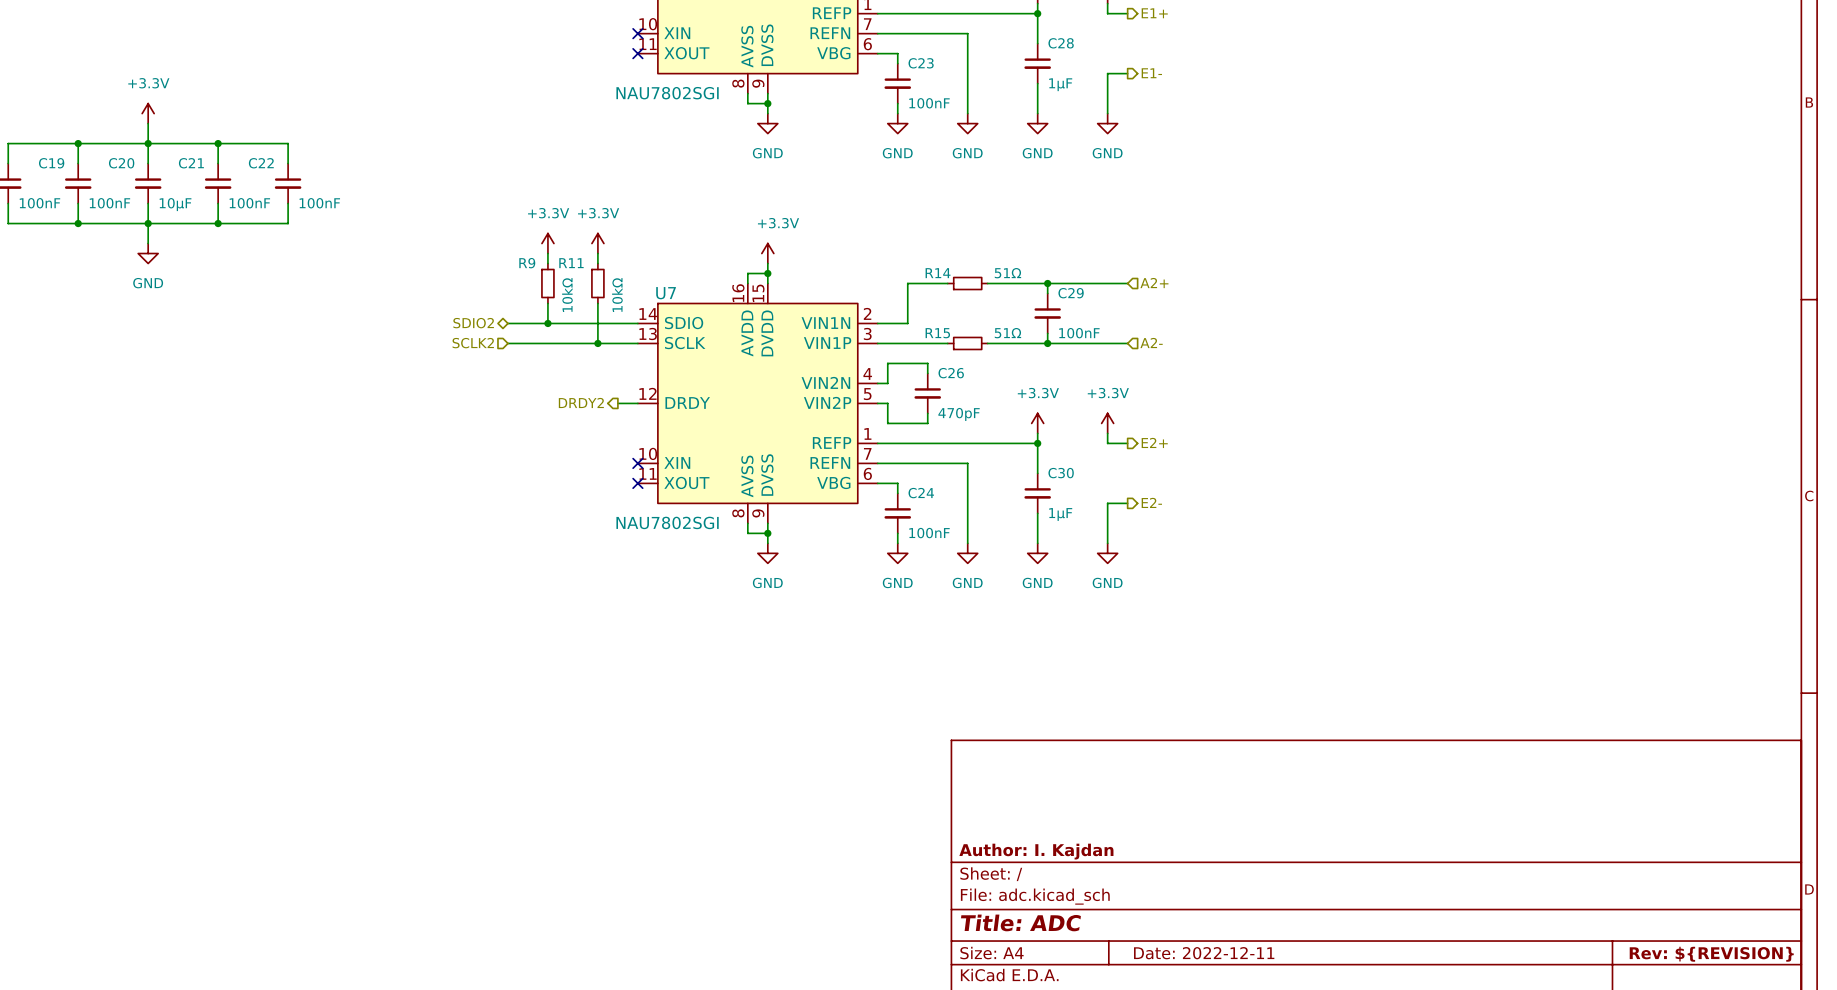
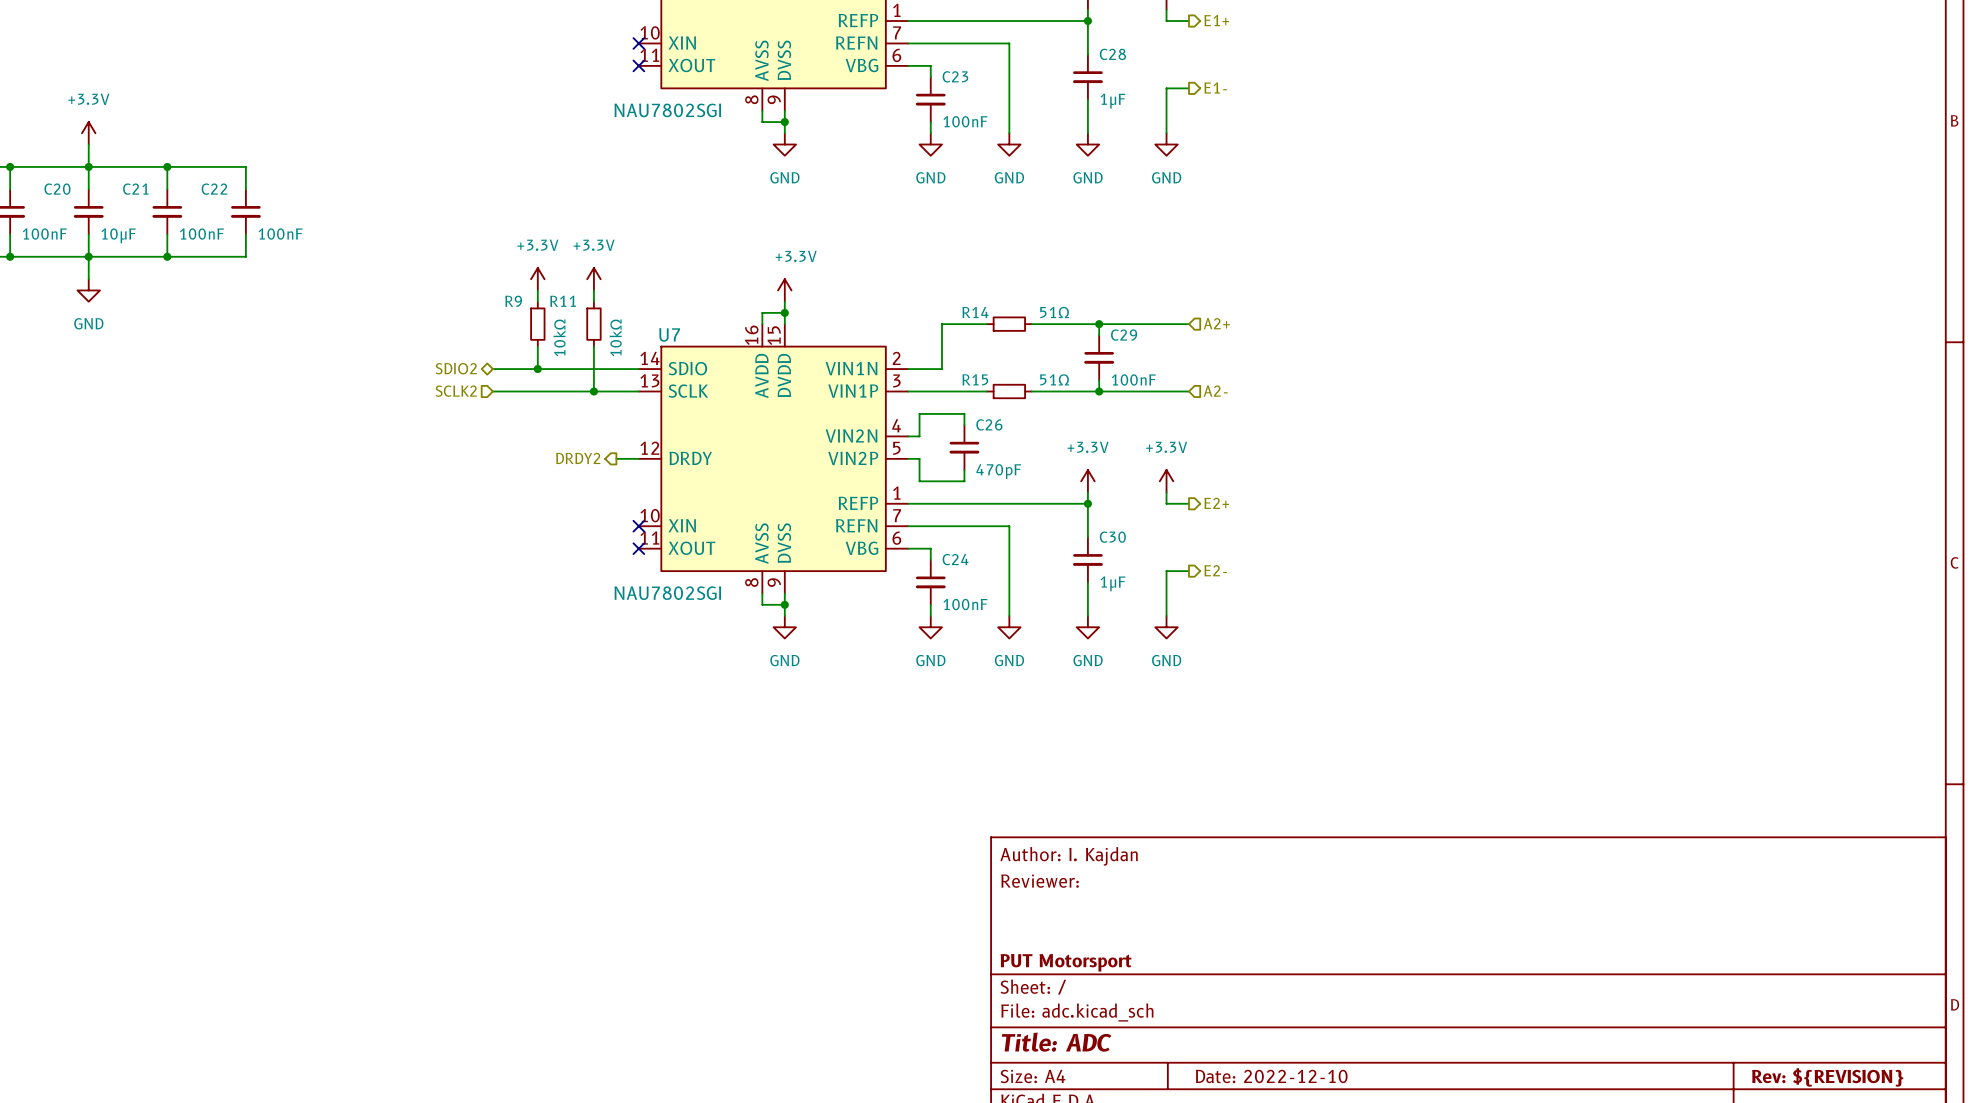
title block: none -> Author: I. Kajdan (1069, 856)
title block: none -> Reviewer: (1040, 881)
title block: Author: I. Kajdan (1036, 851) -> PUT Motorsport (1066, 962)
title block: Date: 2022-12-11 (1204, 953) -> Date: 2022-12-10 (1271, 1076)

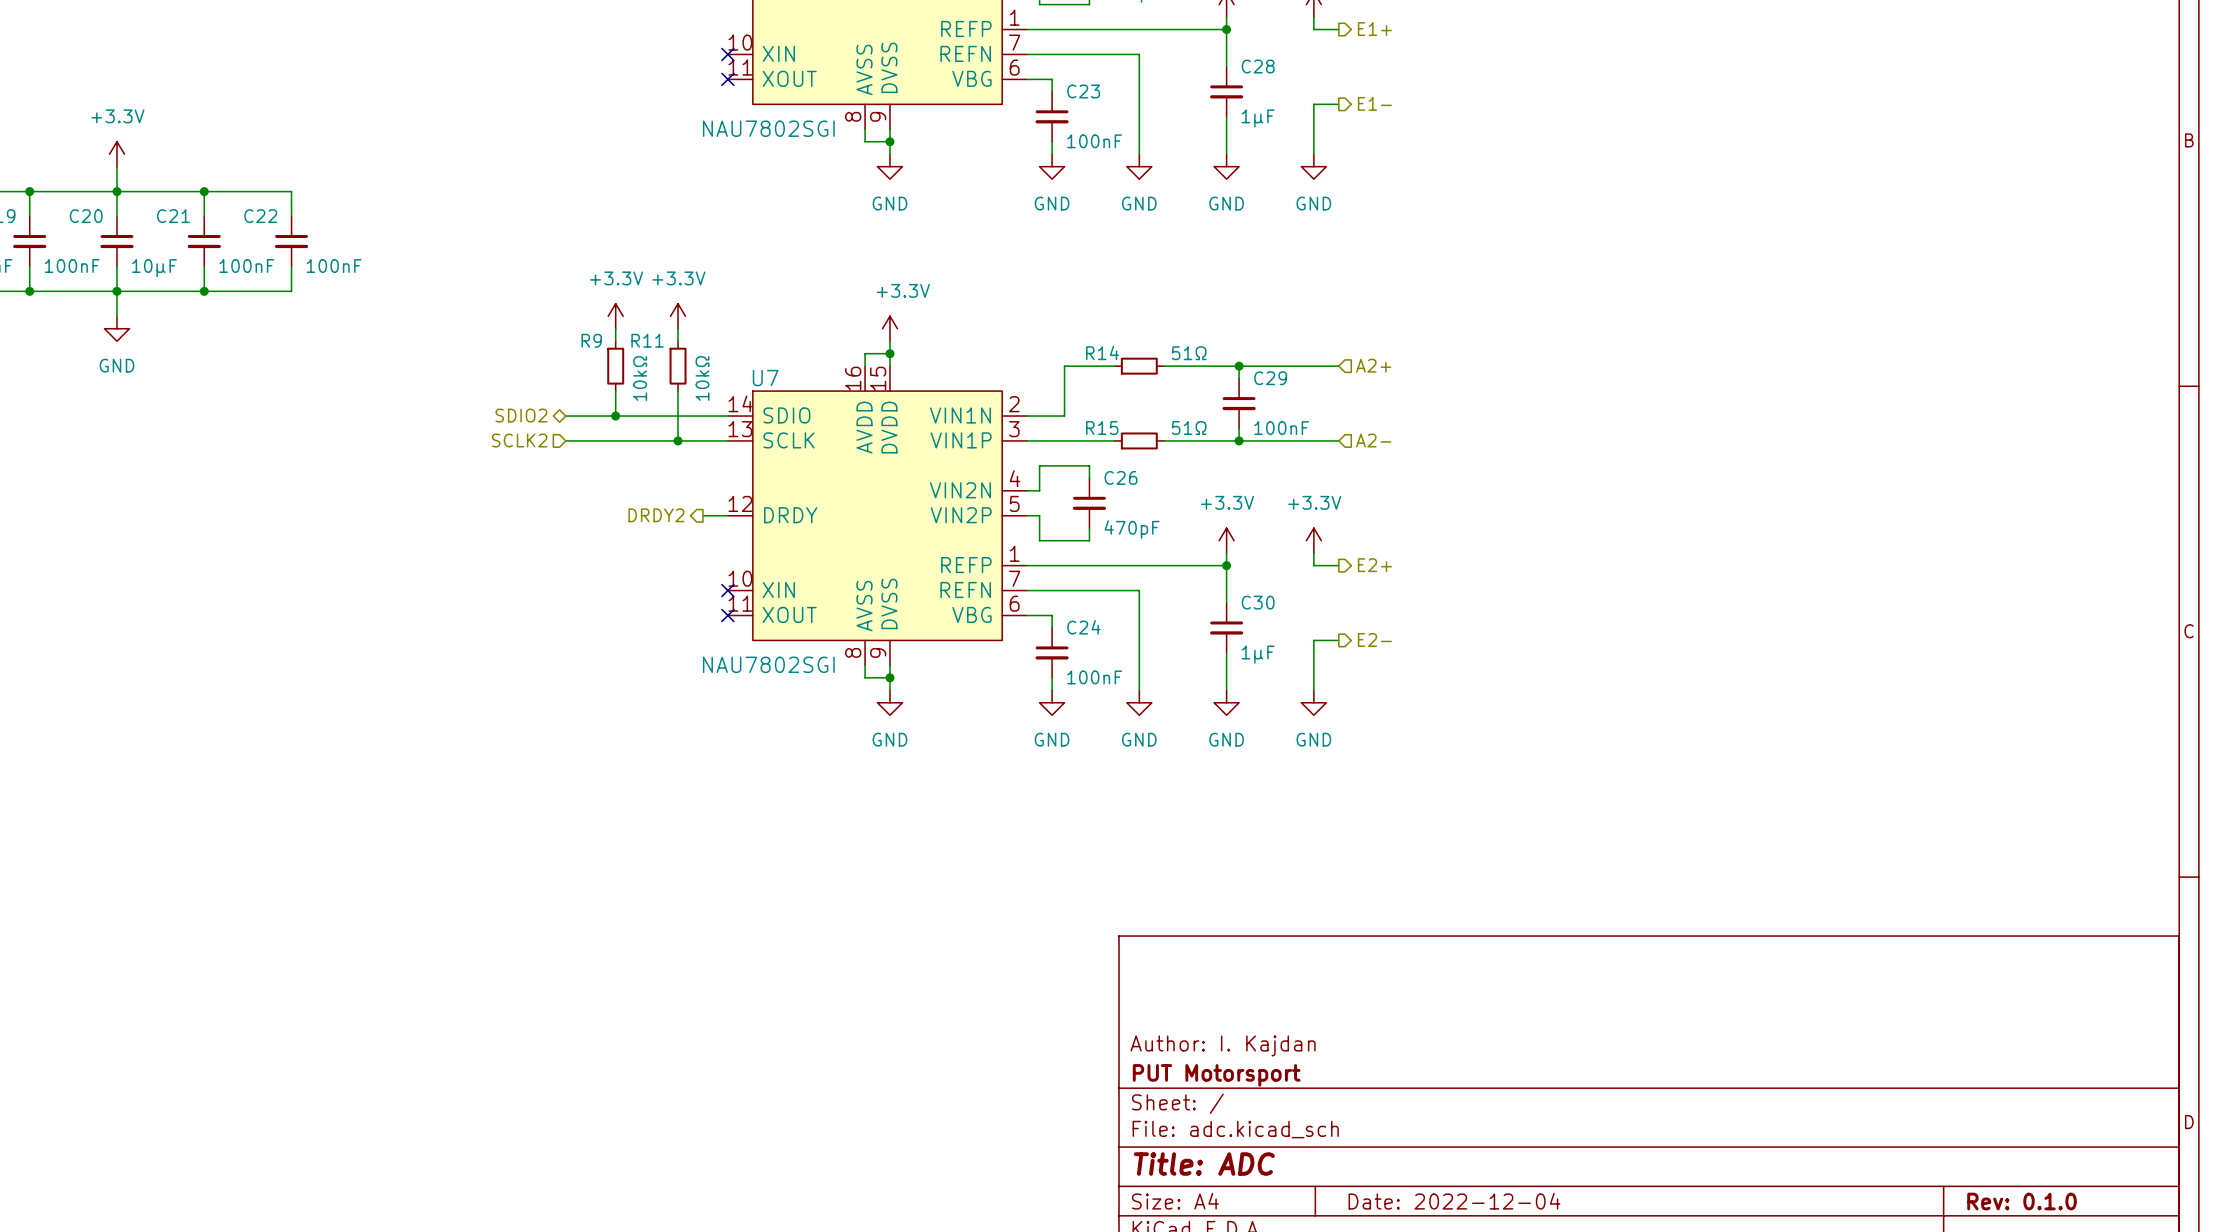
title block position: Author: I. Kajdan (1069, 856) -> Author: I. Kajdan (1223, 1045)
title block: Reviewer: (1040, 881) -> none
title block: Date: 2022-12-10 (1271, 1076) -> Date: 2022-12-04 (1454, 1201)
title block: Rev: ${REVISION} (1827, 1077) -> Rev: 0.1.0 (2022, 1201)

